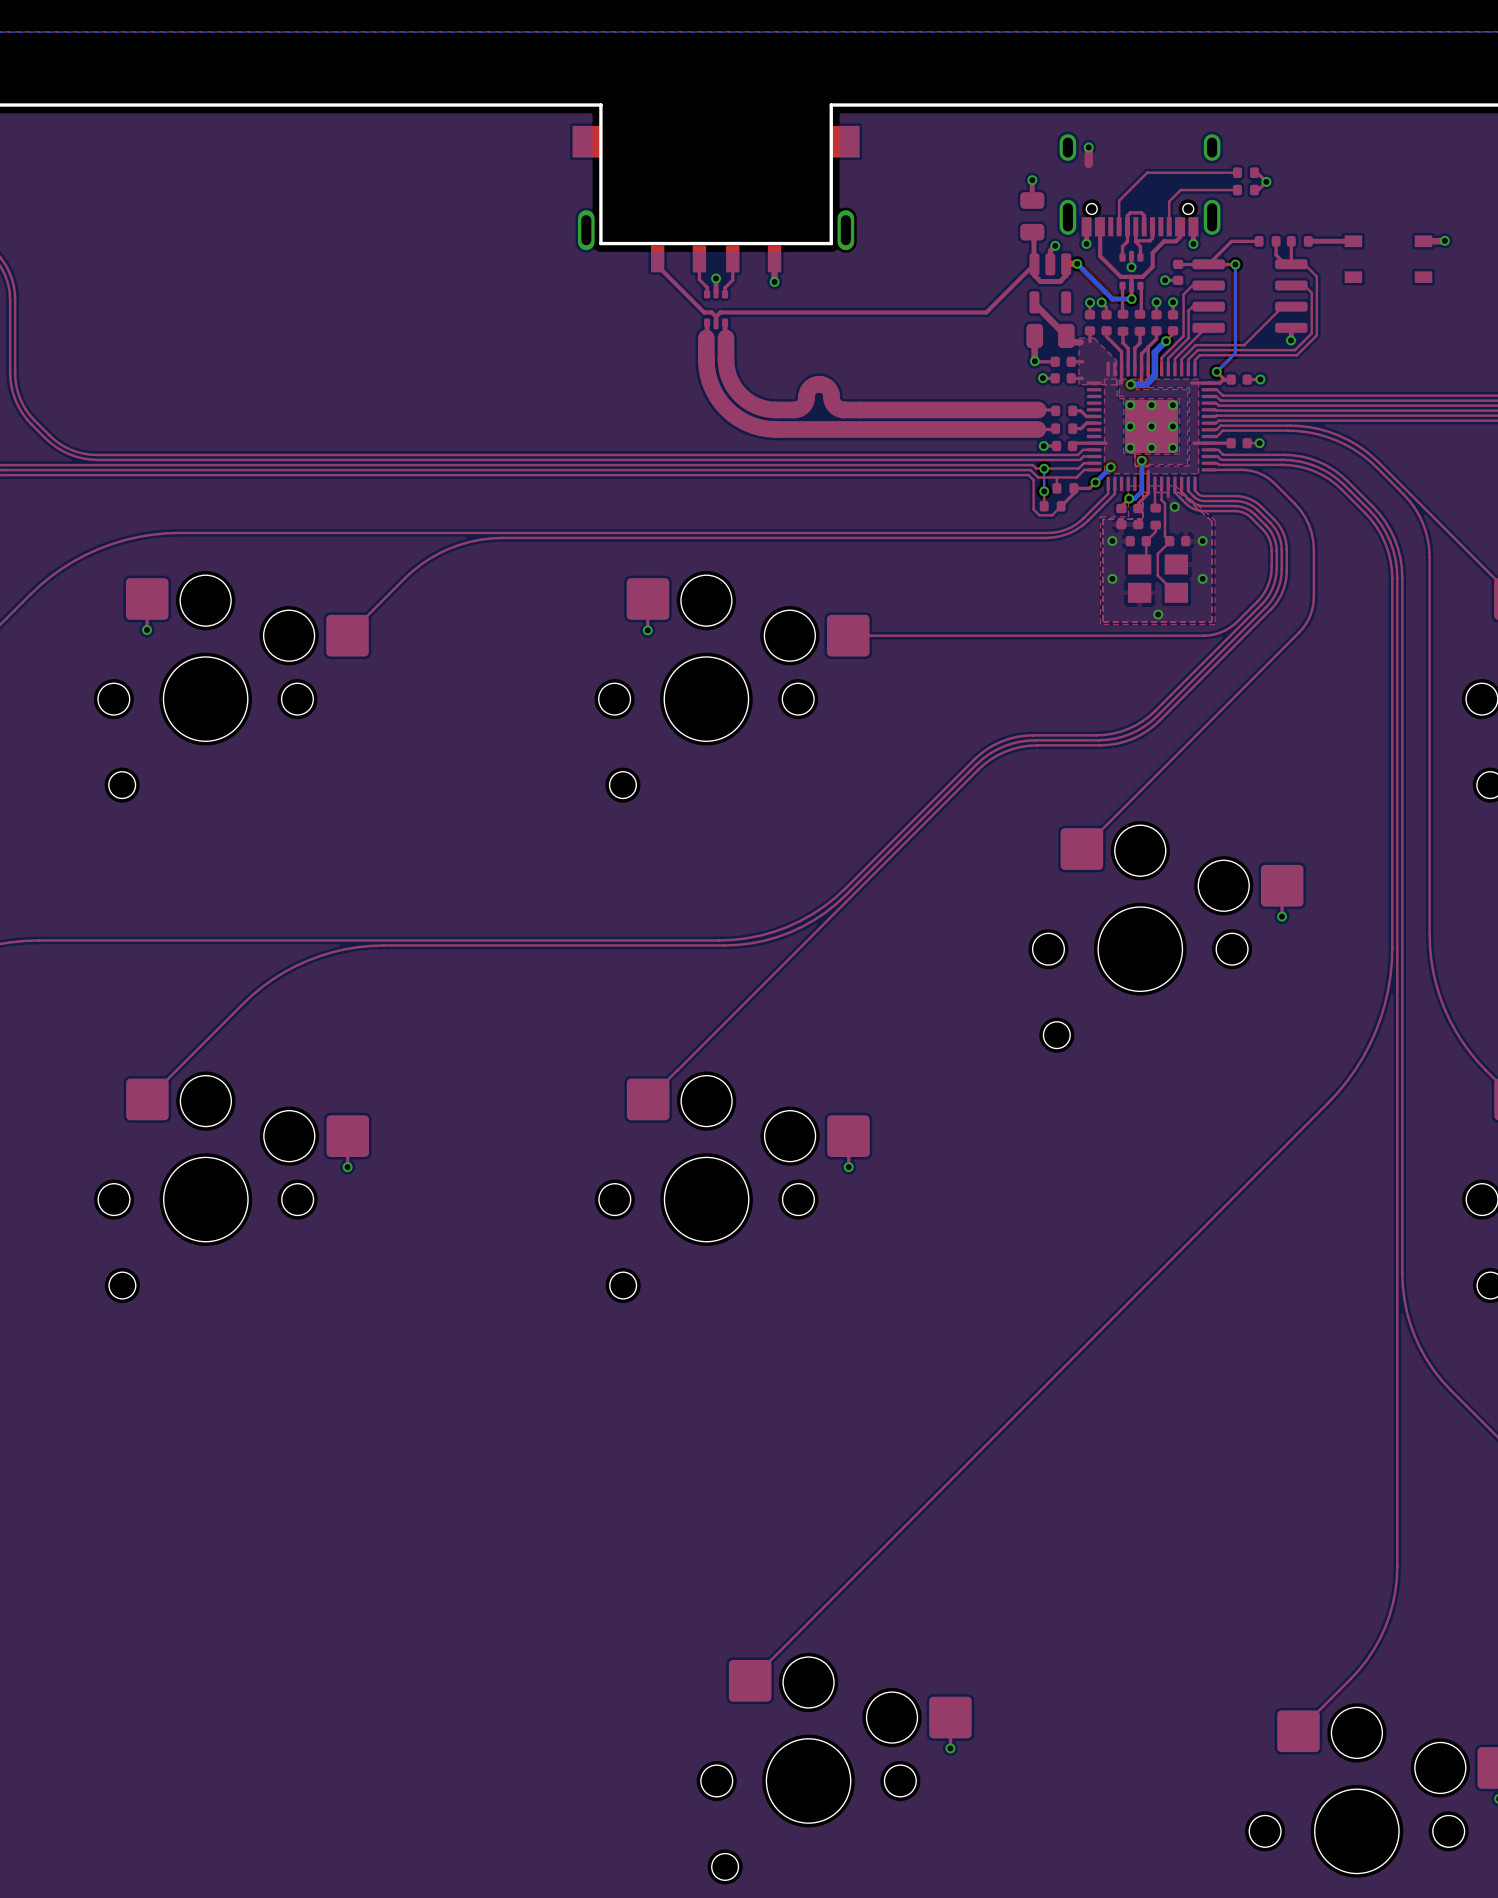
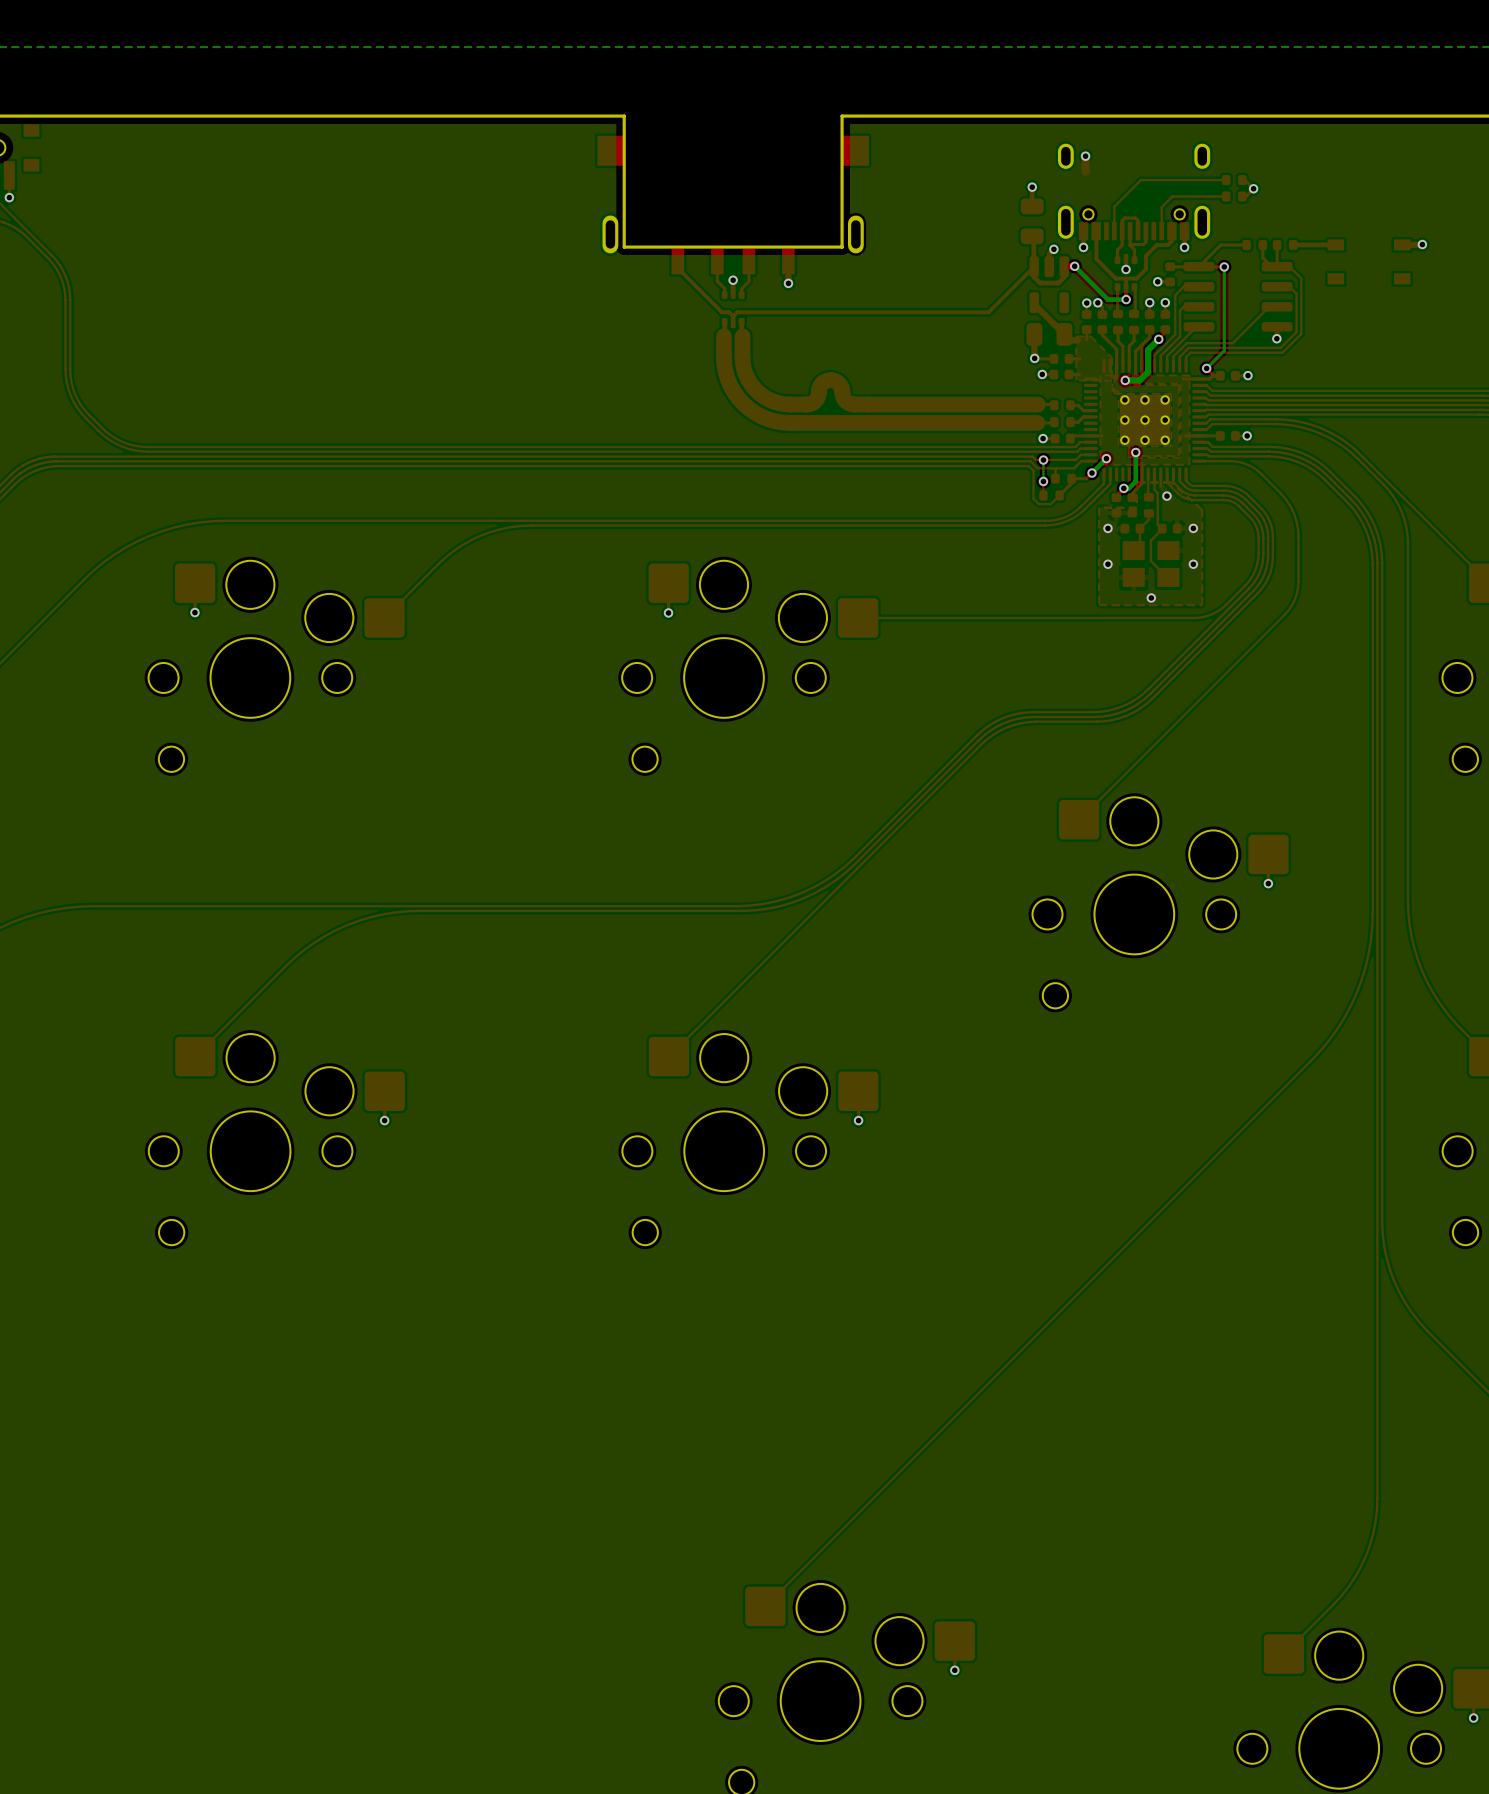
top zone outline: (1175, 485) (1128, 485) (1128, 516) (1100, 516) (1100, 624) (1215, 624) (1215, 520) (1175, 485) -> none

